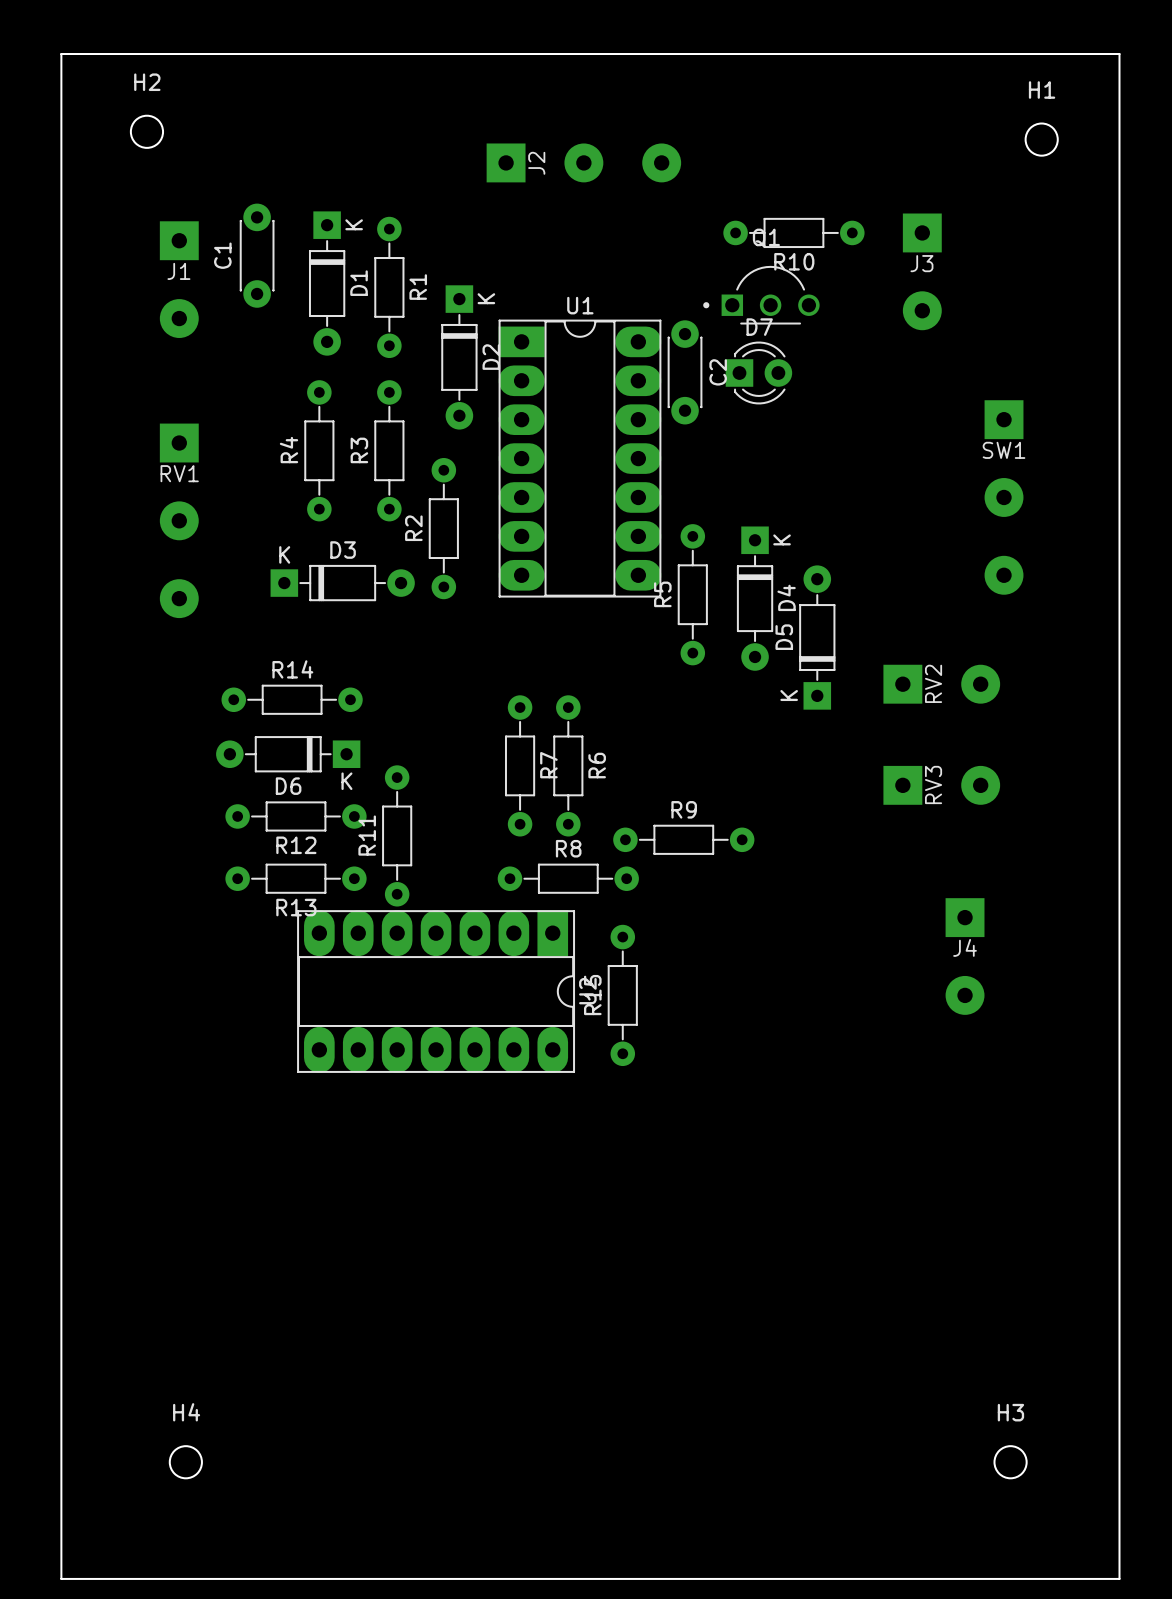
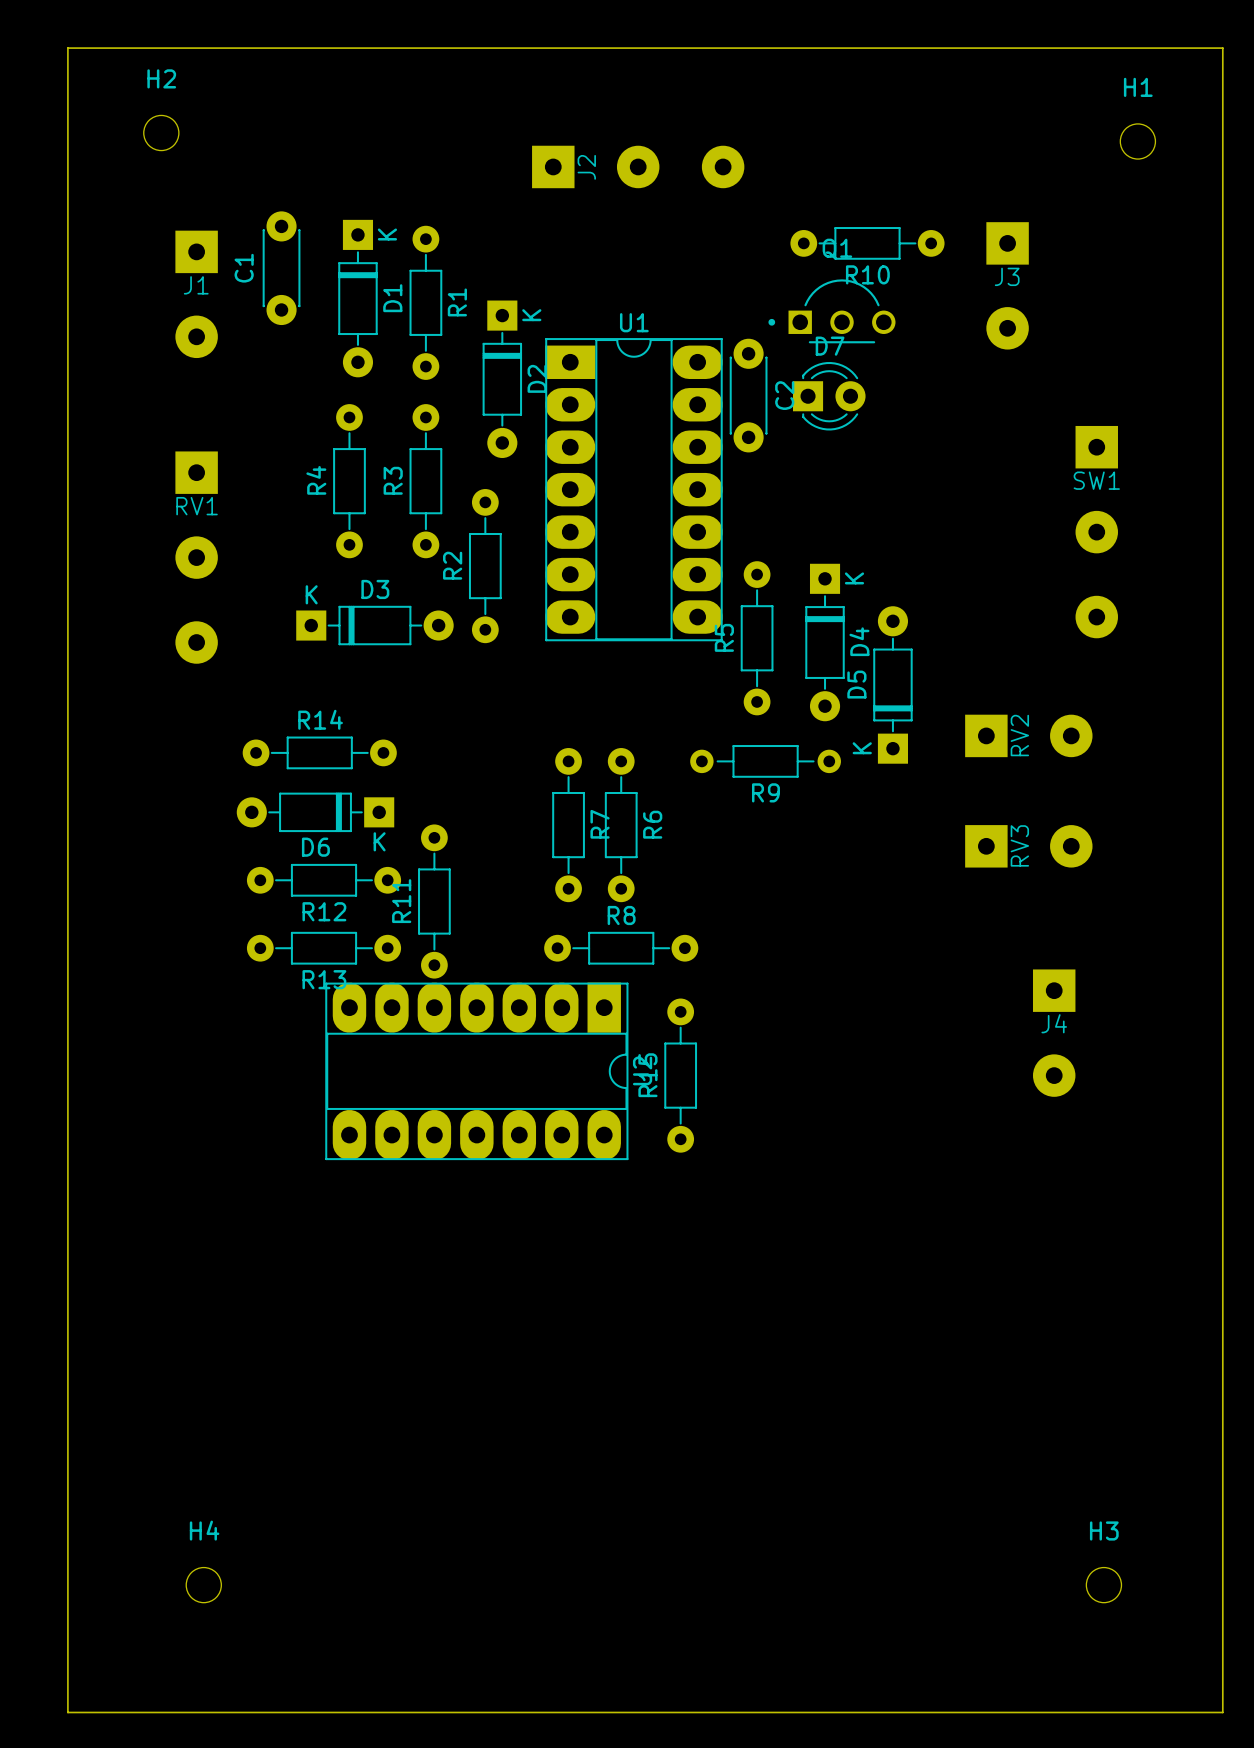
R9 name position: R9 (684, 809) -> R9 (765, 792)
R9 footprint: [613, 824, 755, 855] -> [690, 745, 841, 778]

